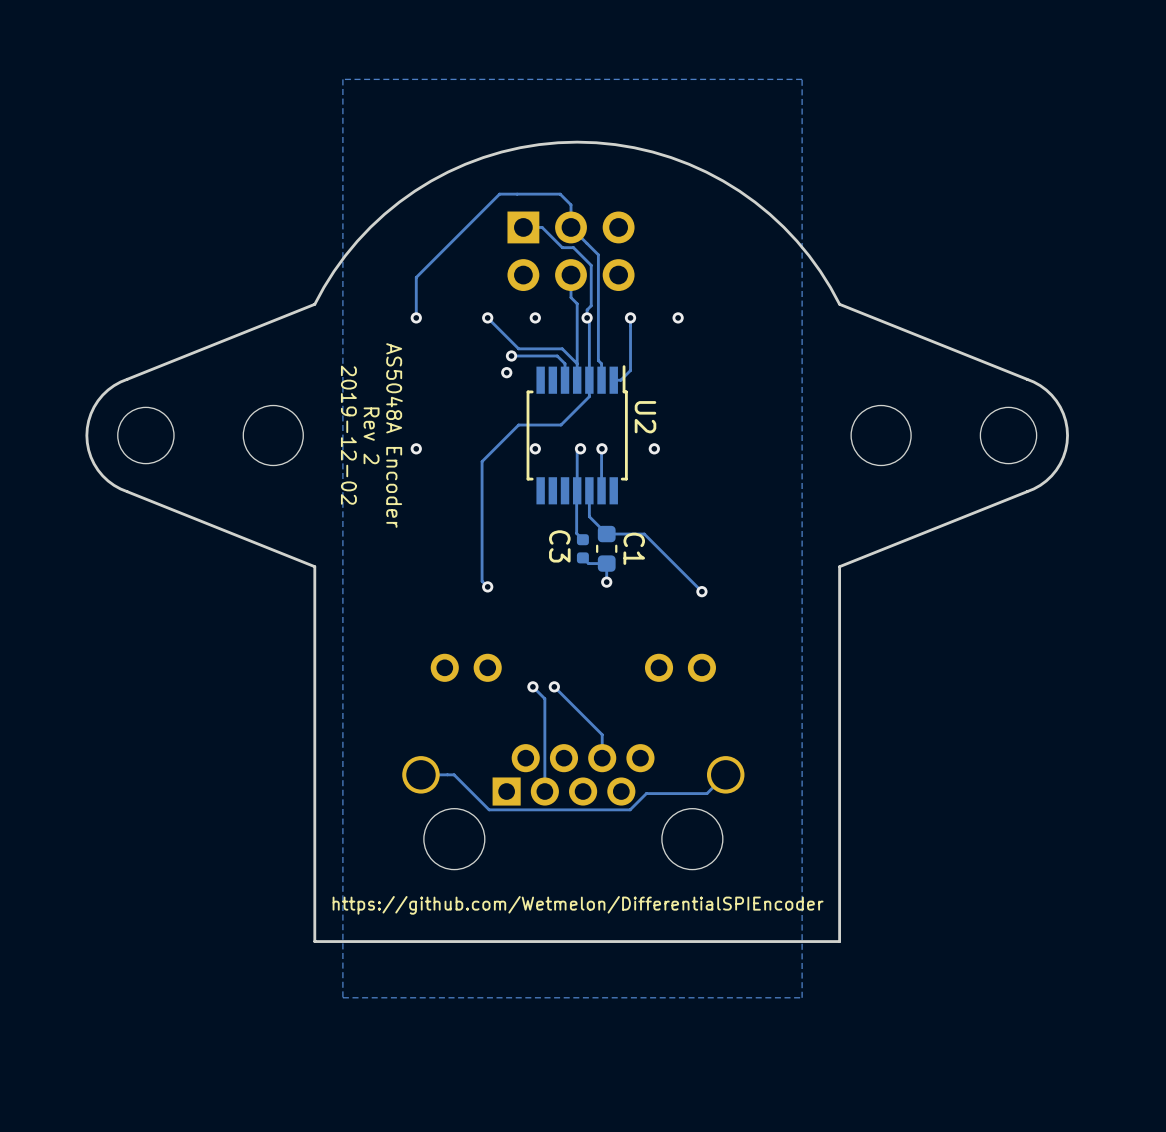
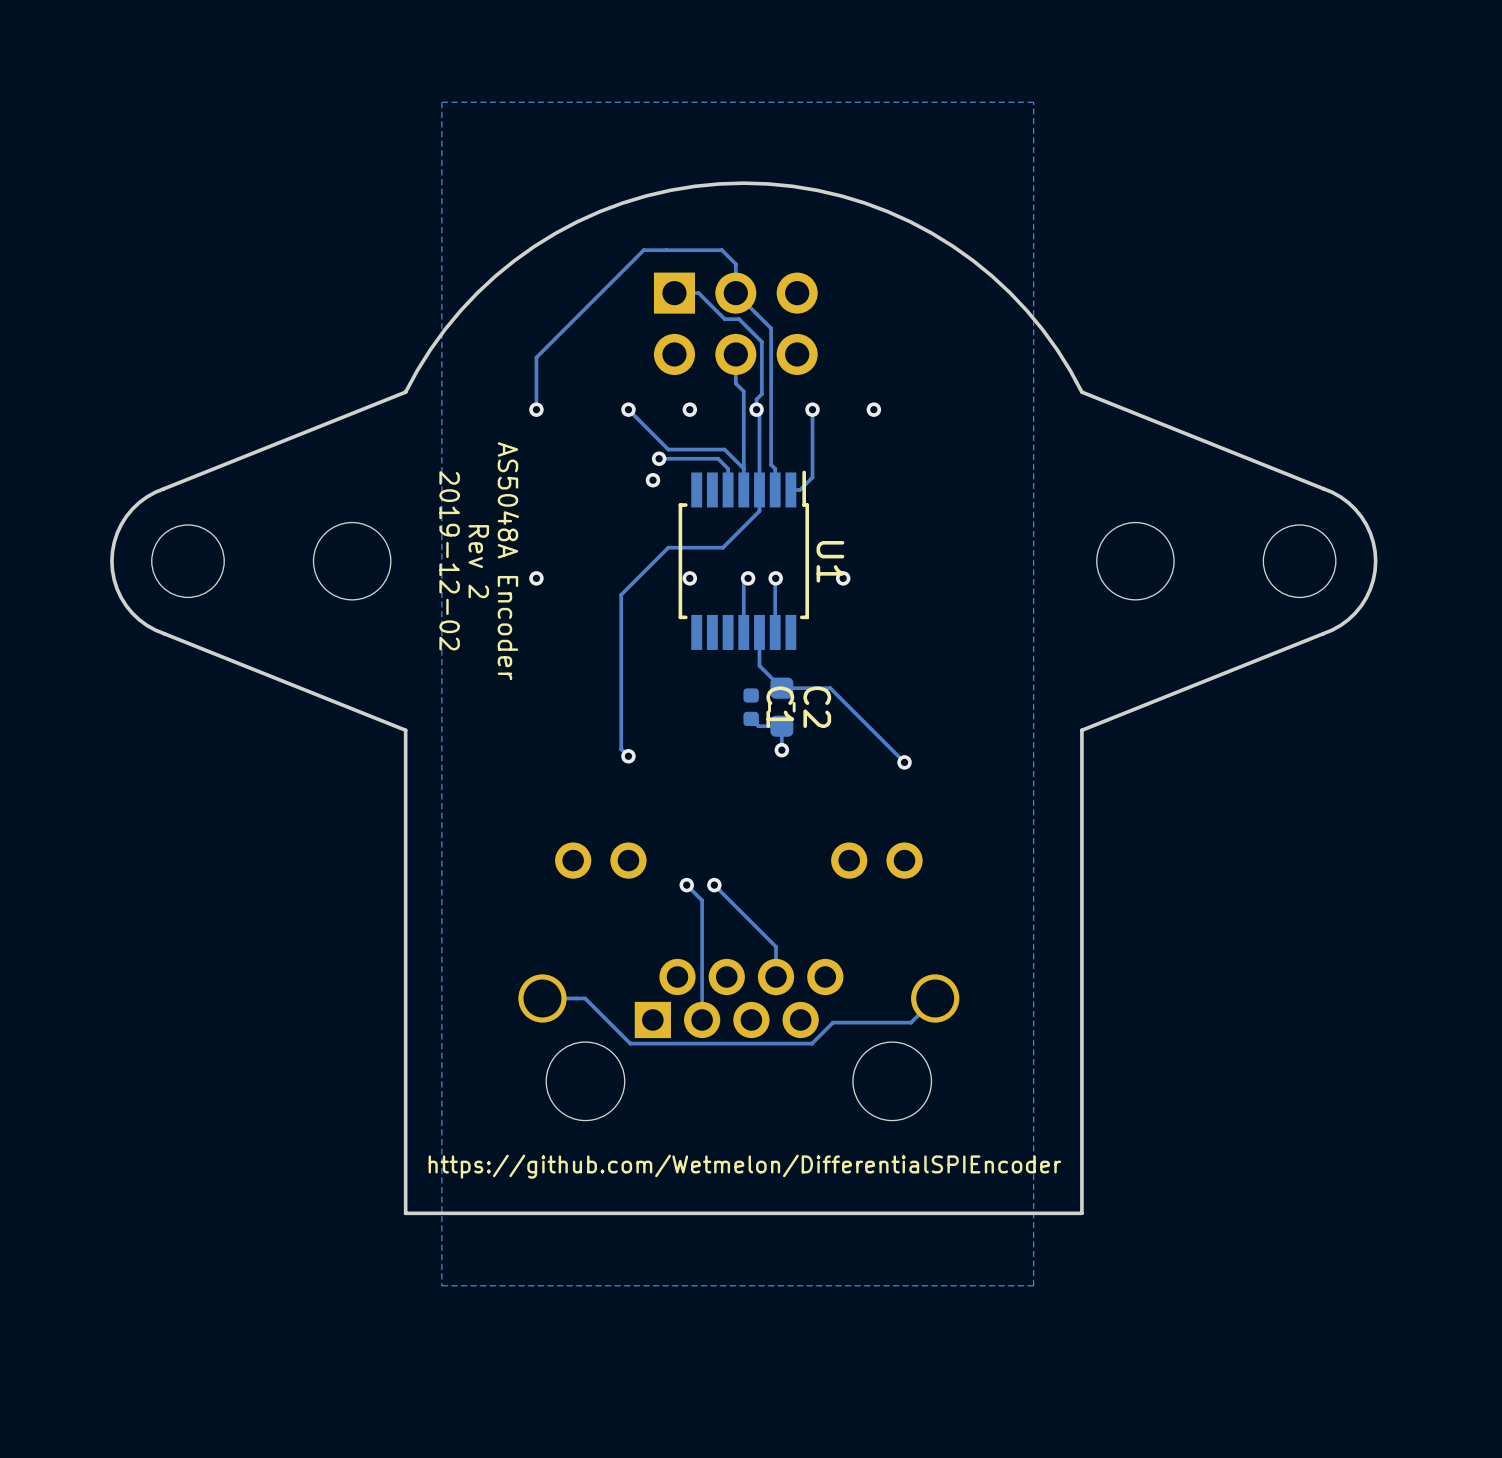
U2 name: U2 (645, 417) -> U1 (830, 561)
track: (577, 490) (576, 533) (582, 539) -> none
C3 name: C3 (559, 546) -> C1 (780, 707)
C1 name: C1 (634, 548) -> C2 (817, 707)

